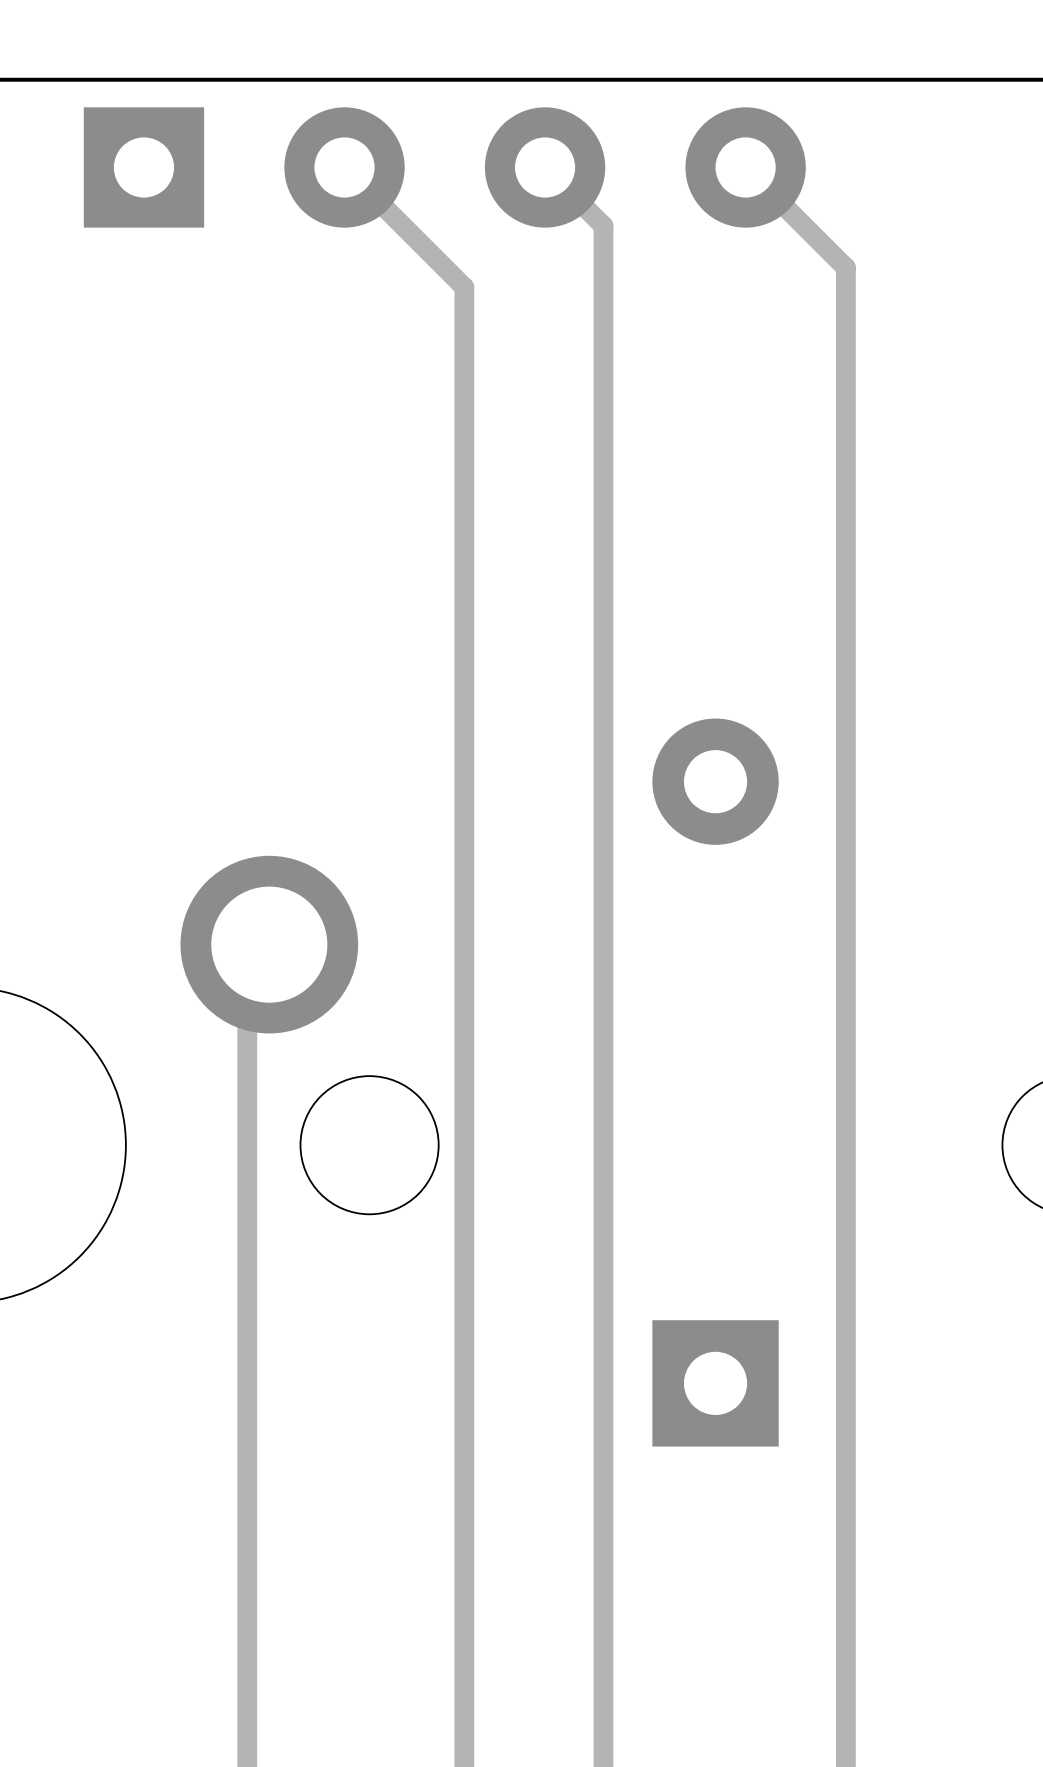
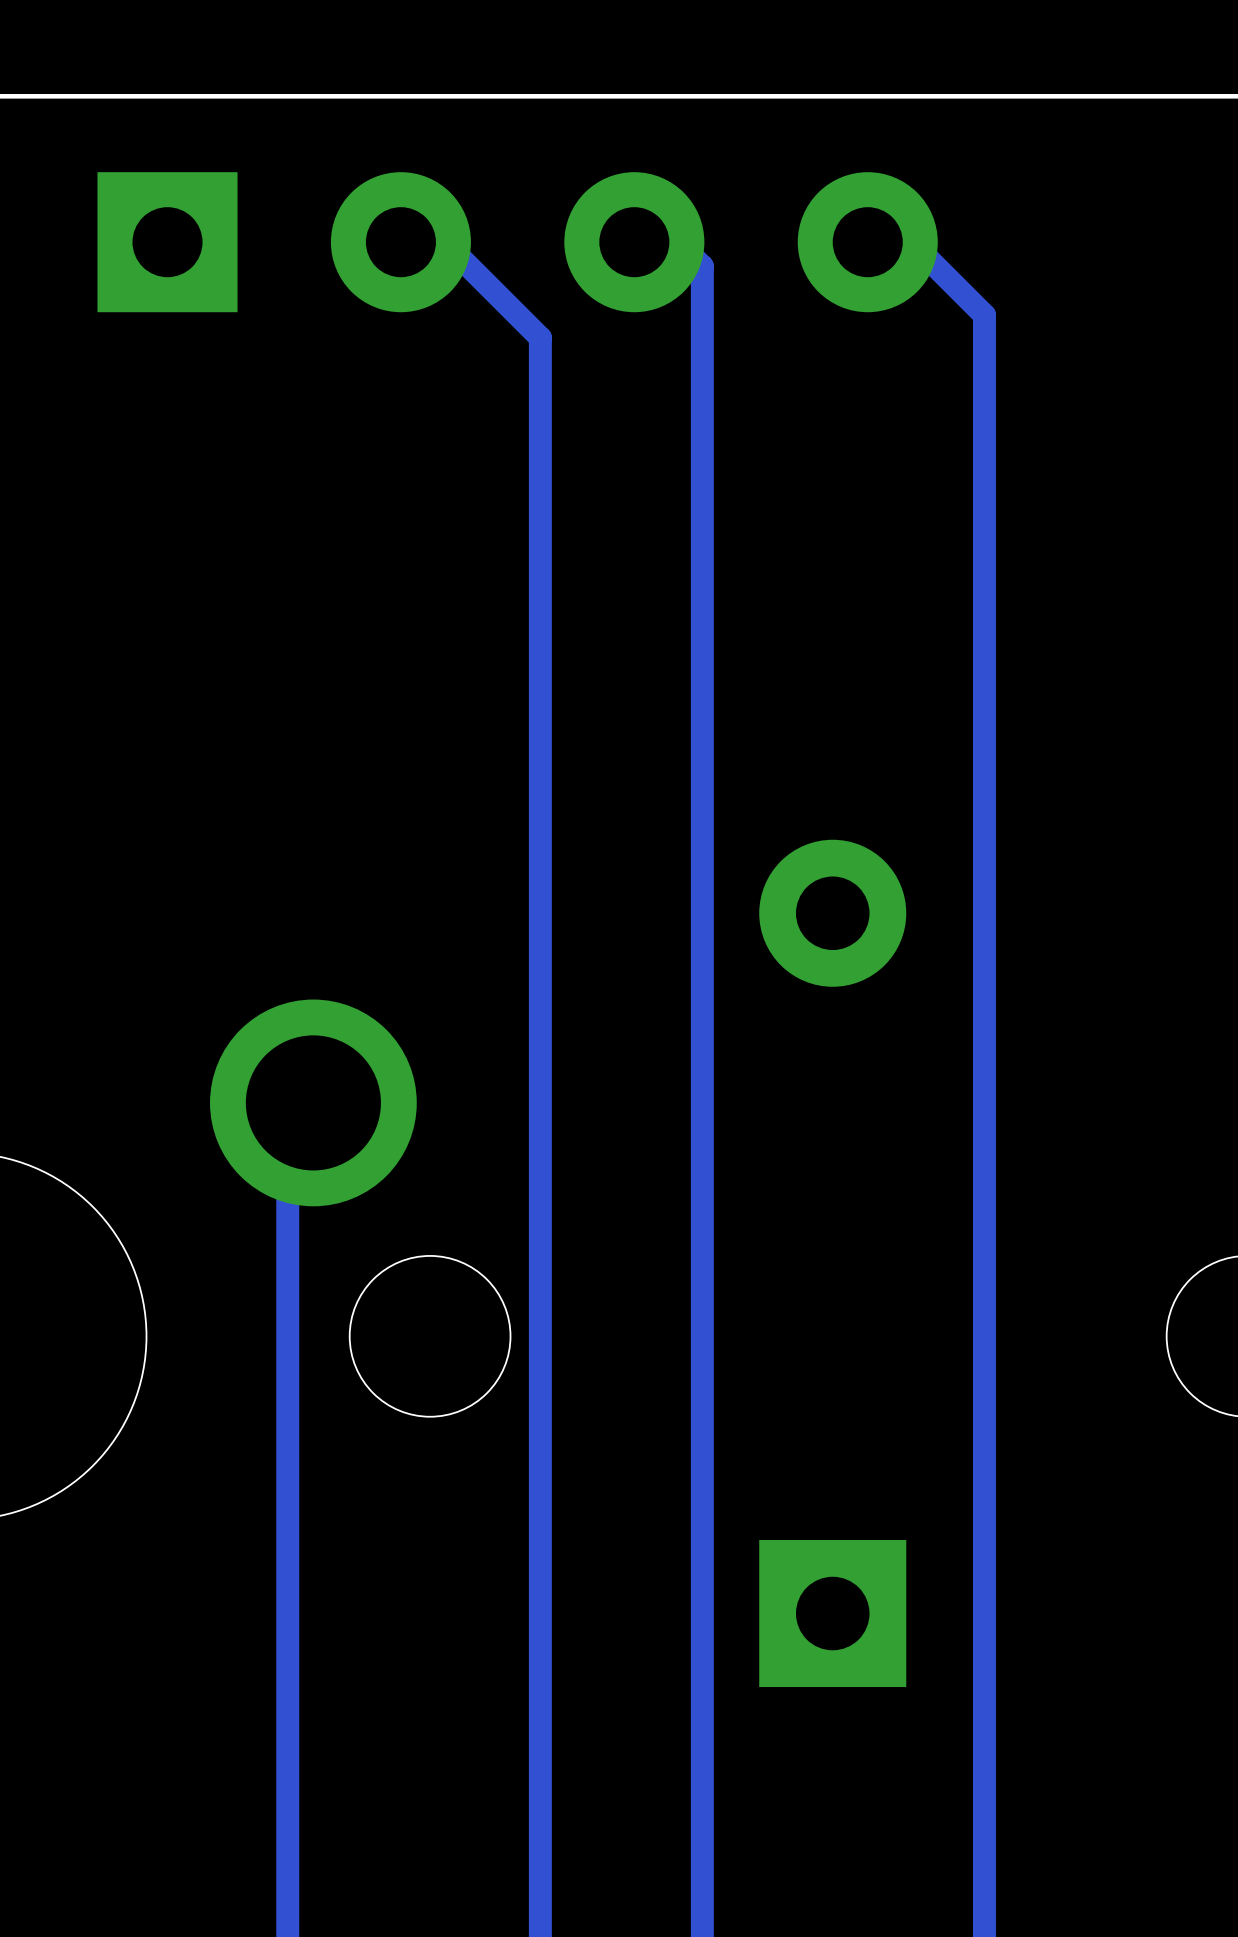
part position: (444, 167) -> (517, 242)

